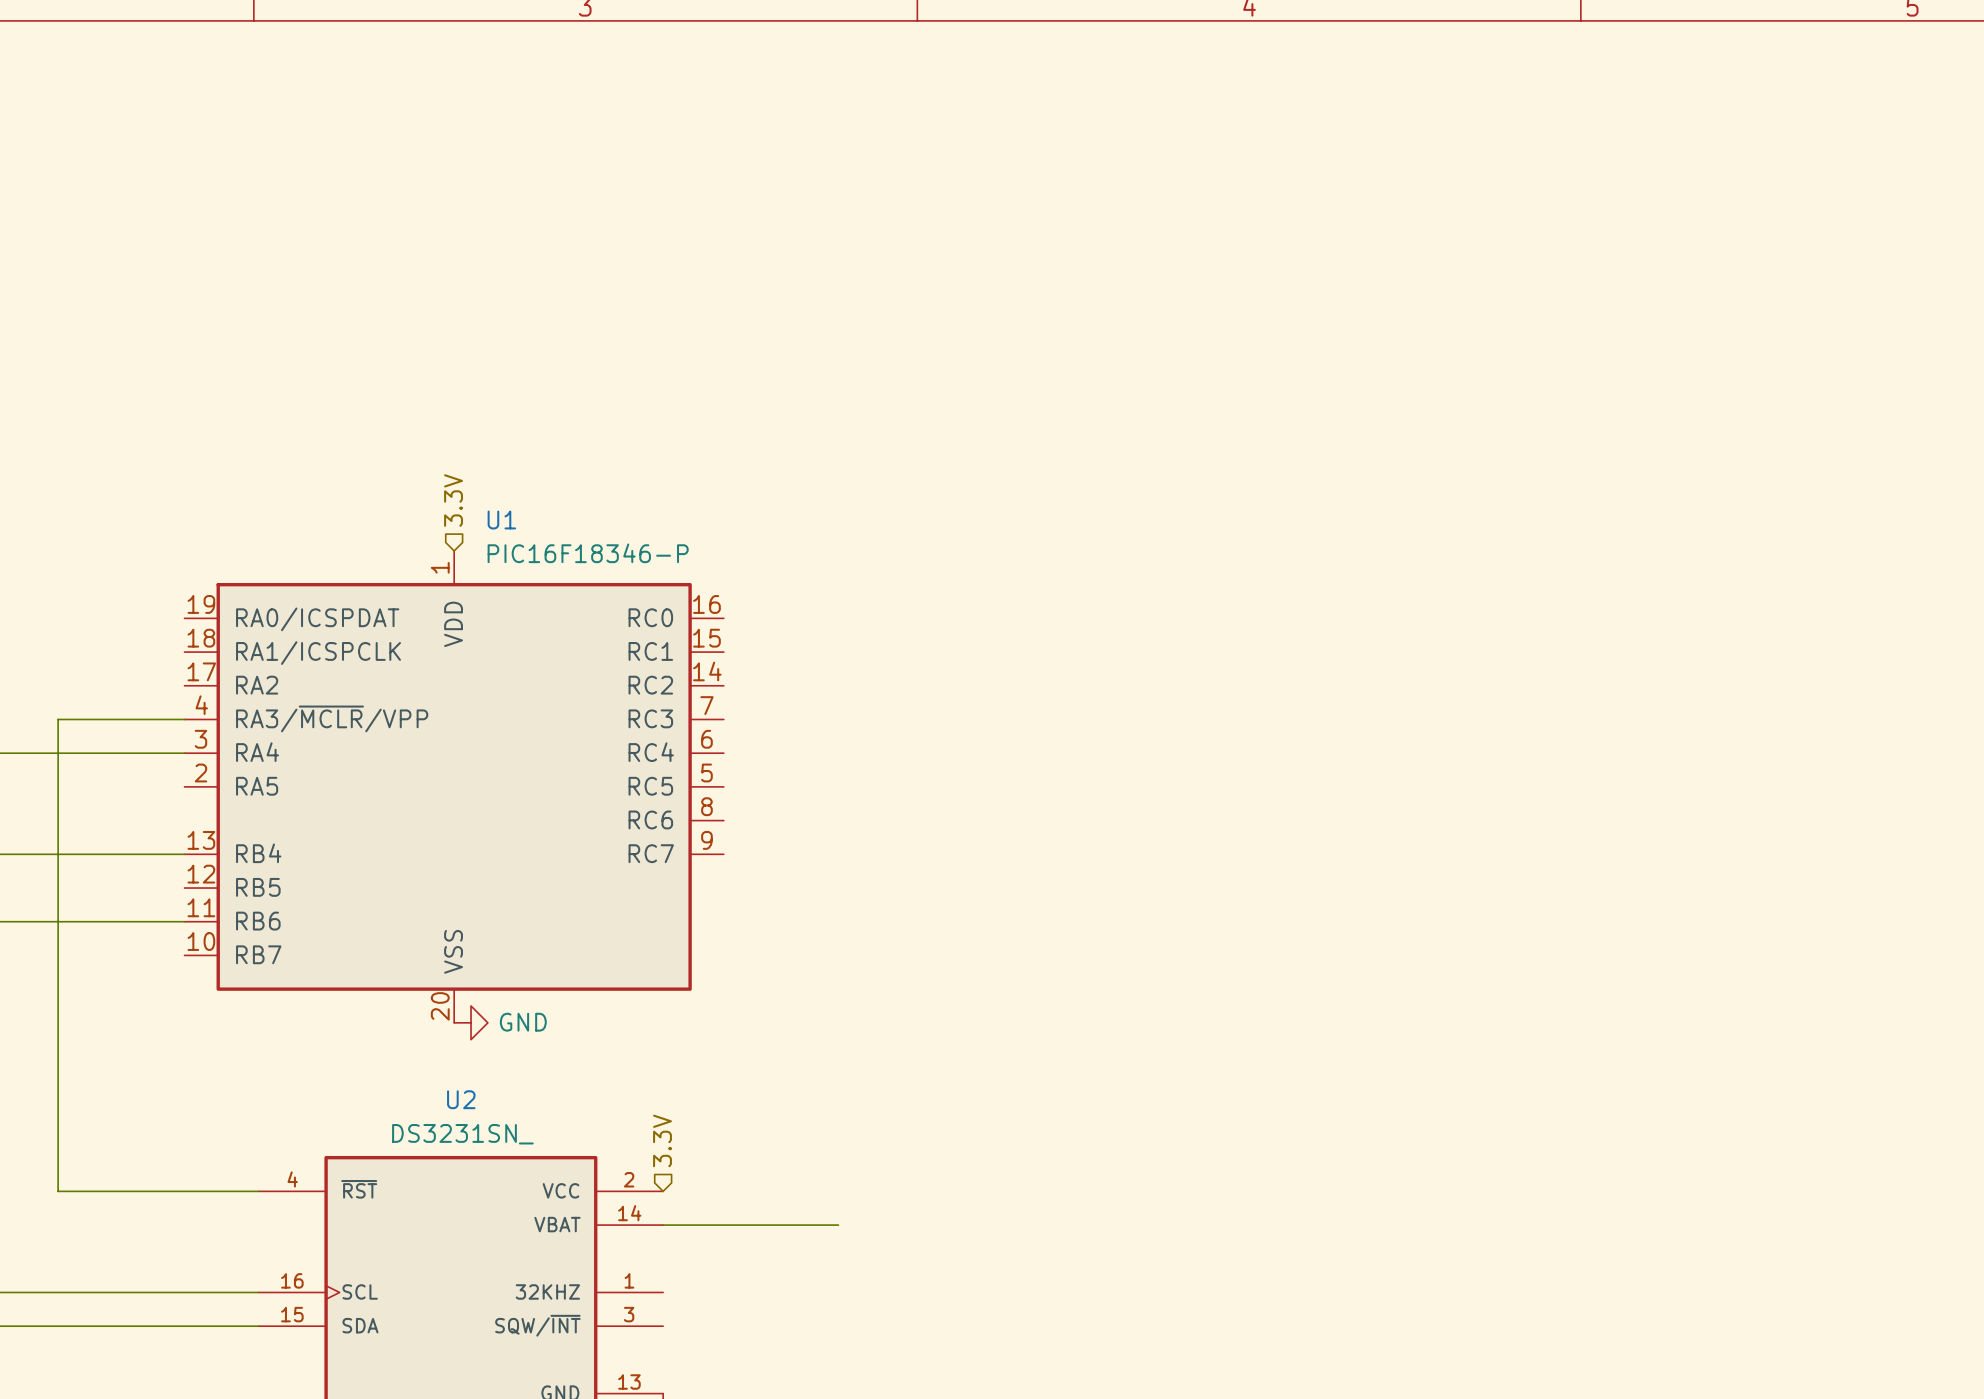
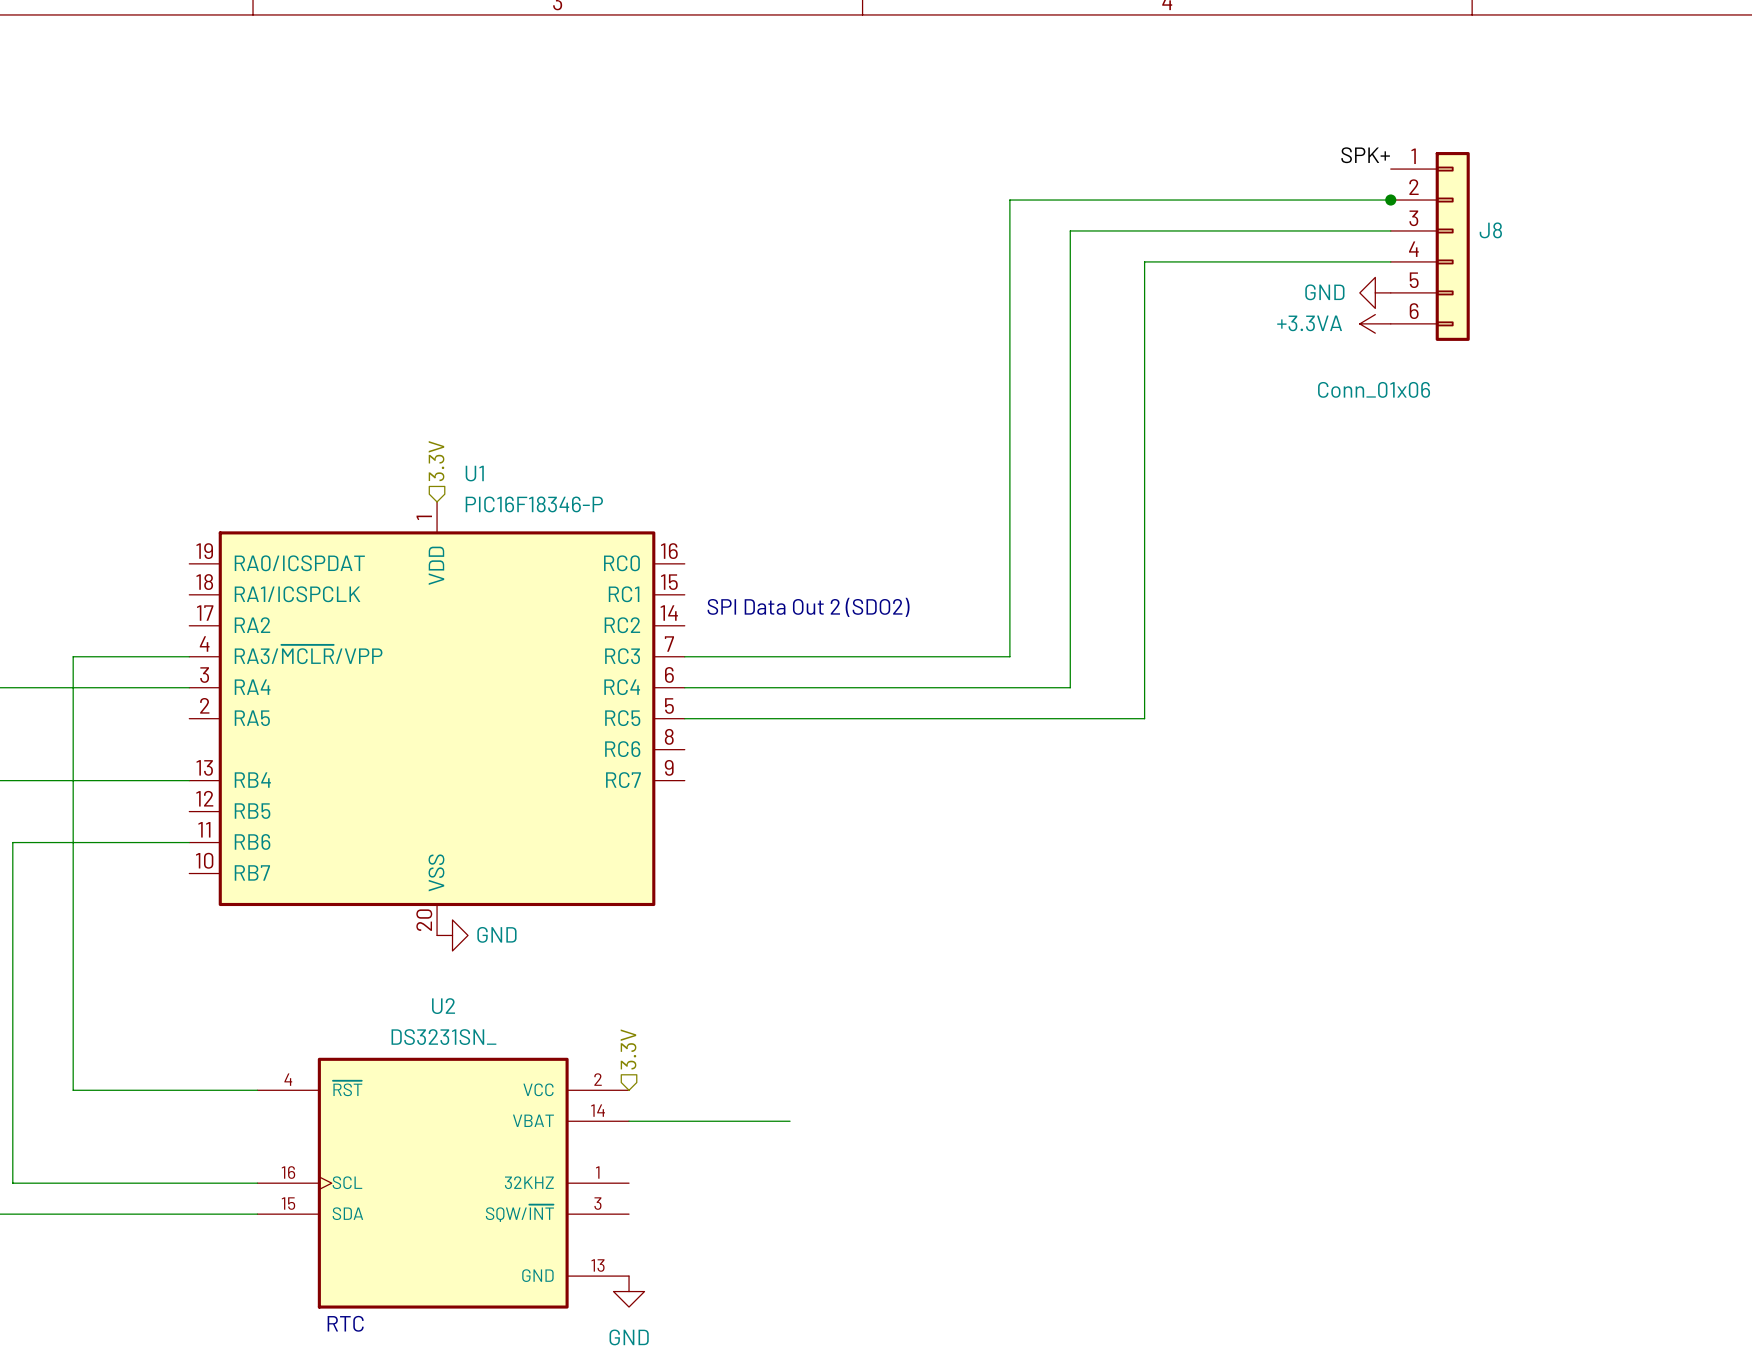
label: none -> SPK+ (1365, 155)
junction: none -> (1390, 200)
wire: none -> (1392, 200) (1009, 200) (1009, 656) (684, 656)
wire: none -> (1390, 230) (1070, 230) (1070, 687) (684, 687)
J8: none -> Conn_01x06 (1430, 246)
wire: none -> (1390, 261) (1144, 261) (1144, 718) (684, 718)
power symbol: none -> GND (1375, 292)
power symbol: none -> +3.3VA (1375, 323)
text: none -> SPI Data Out 2 (SDO2) (808, 607)

